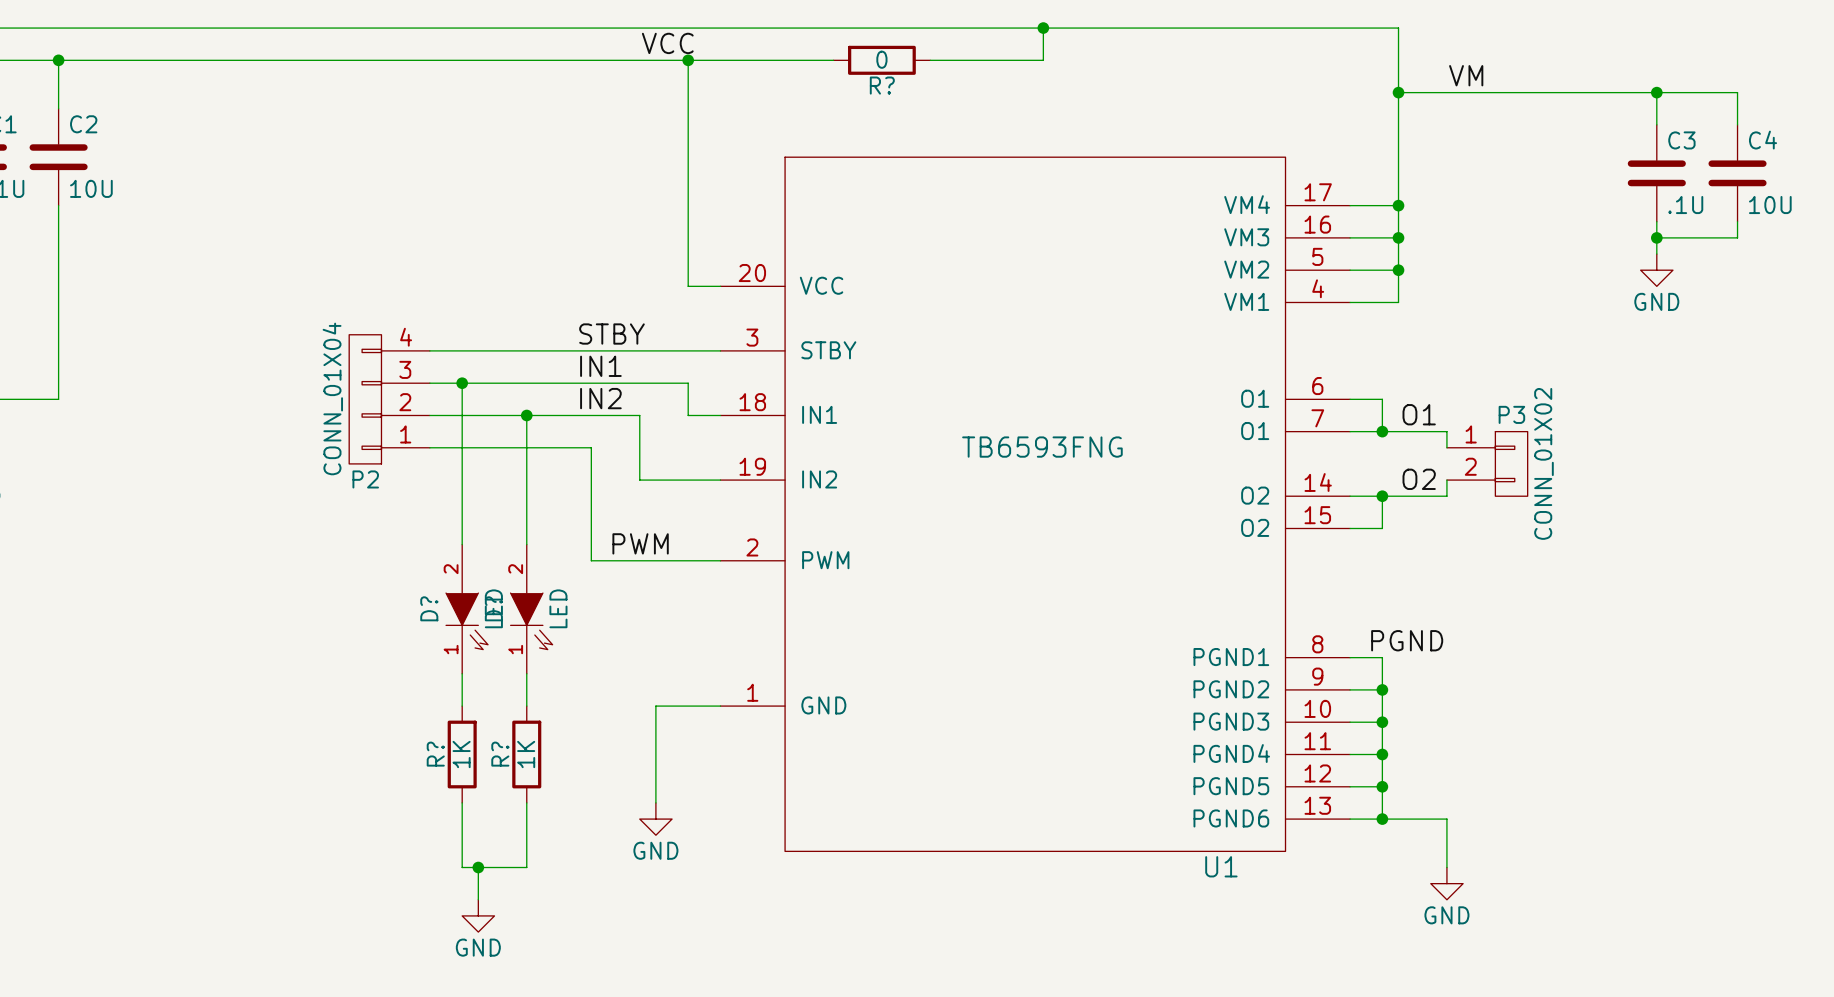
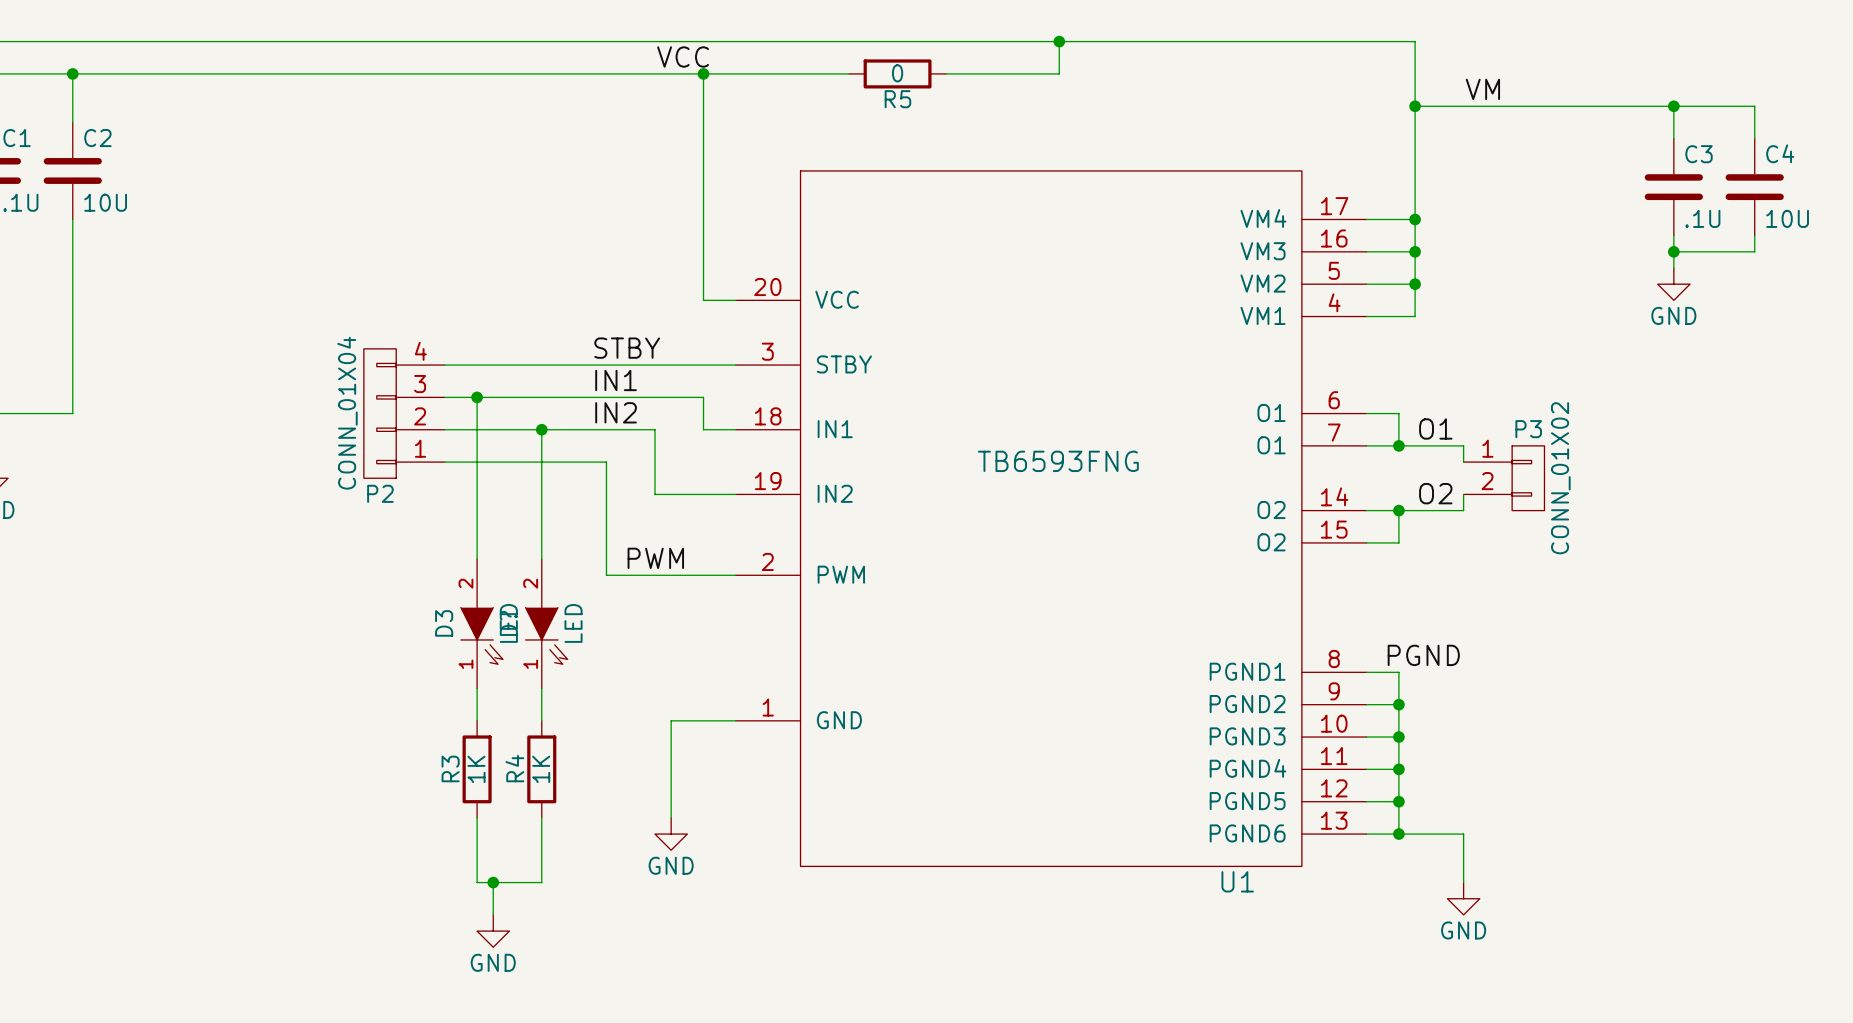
R? name: R? (882, 85) -> R5 (897, 99)
D? name: D? (429, 608) -> D3 (444, 623)
R? name: R? (435, 754) -> R3 (450, 768)
R? name: R? (500, 754) -> R4 (514, 768)

